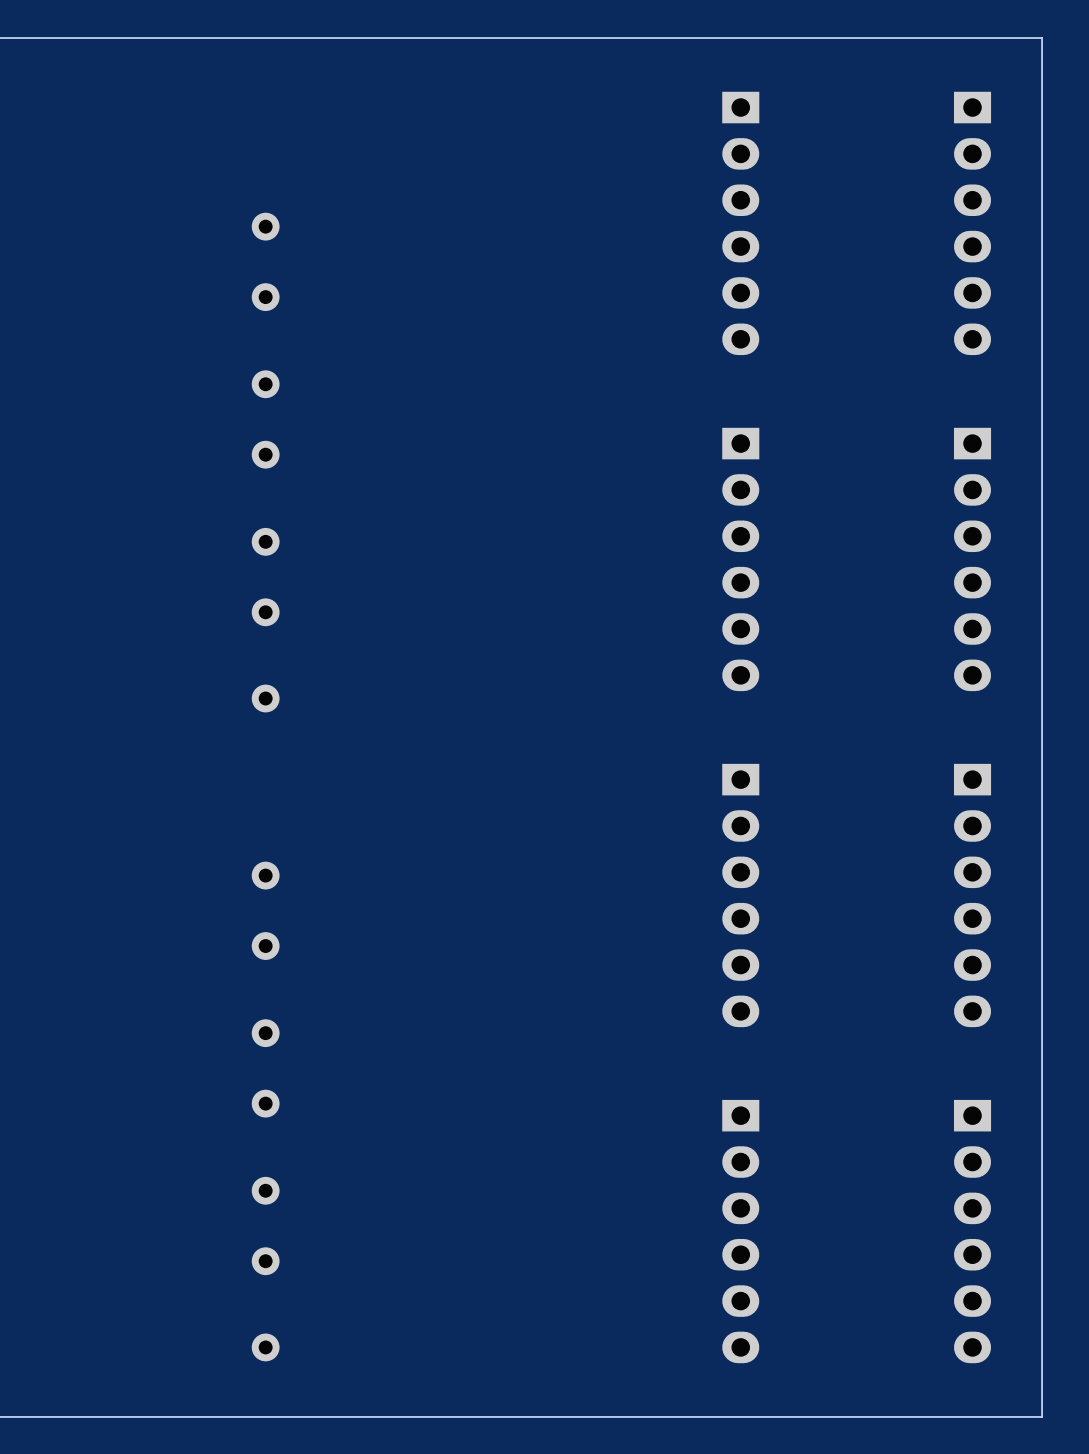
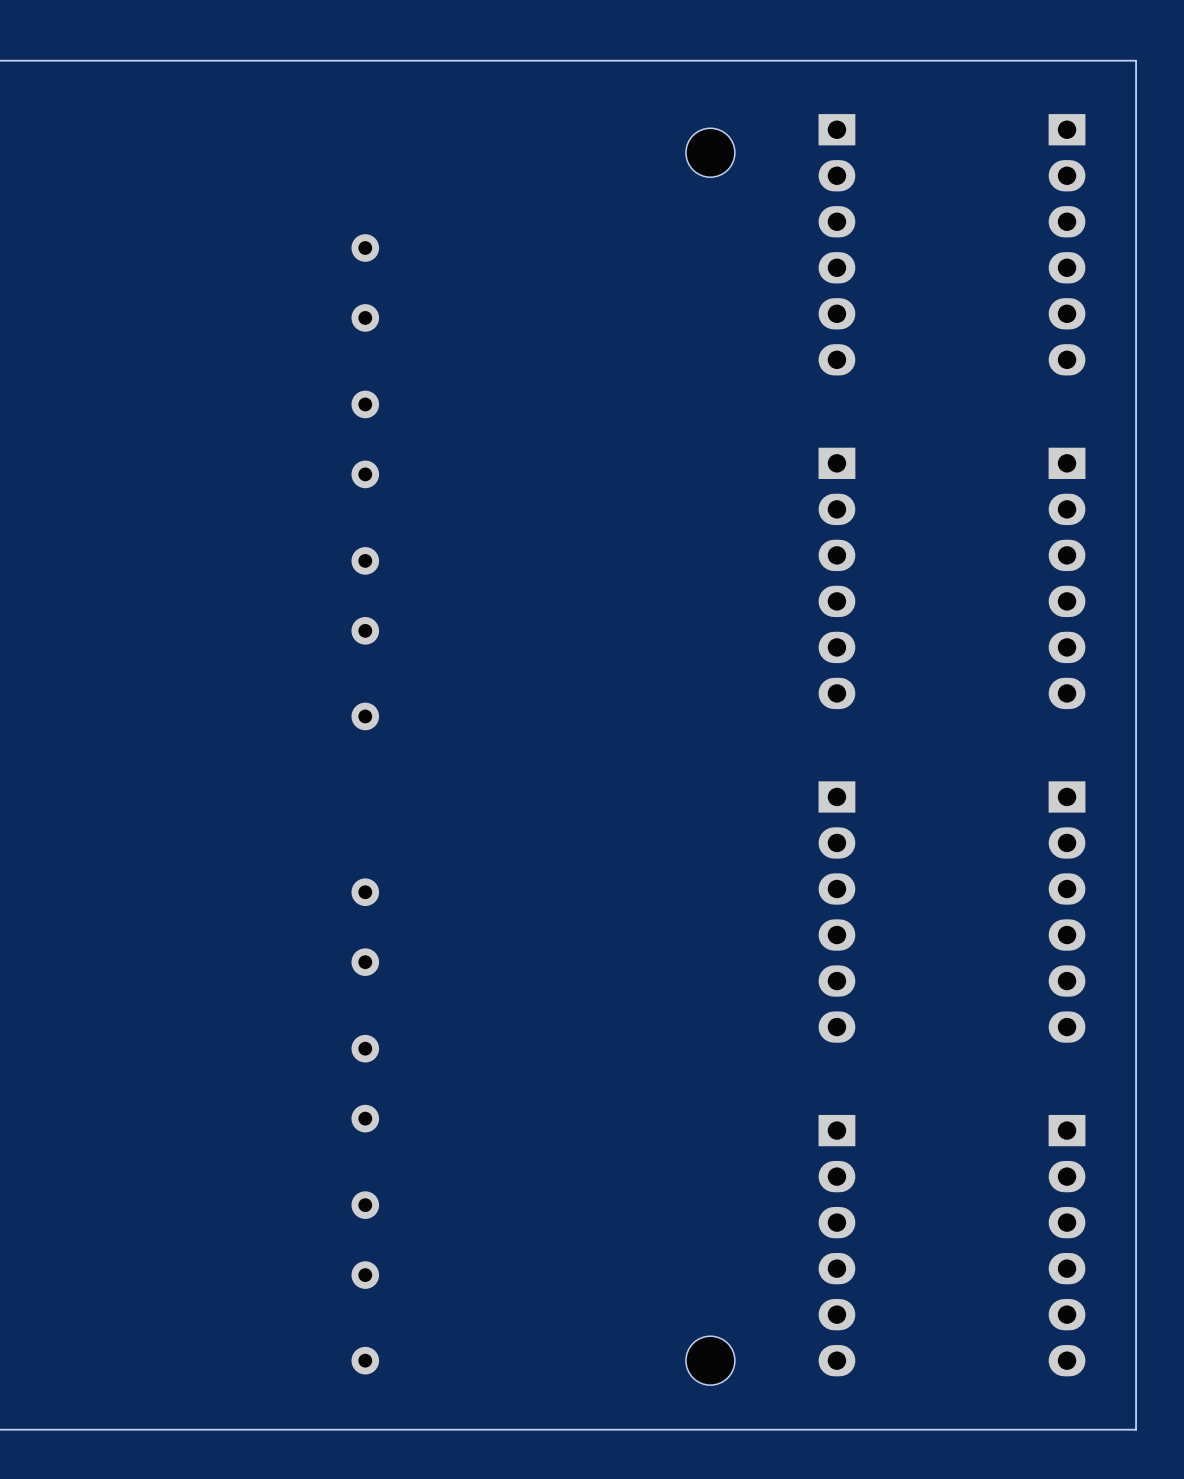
part: none -> (710, 152)
part: none -> (710, 1360)

